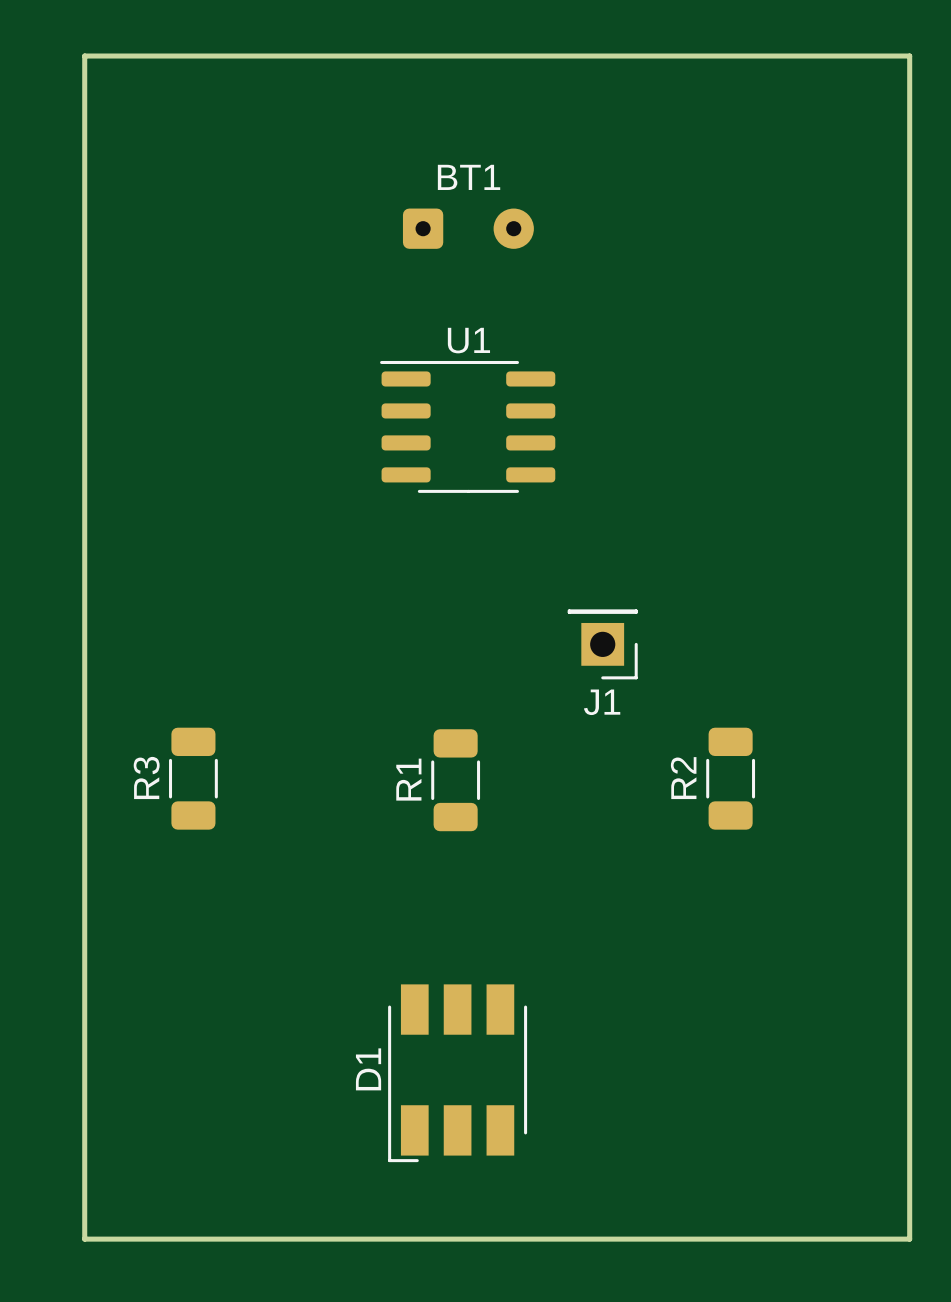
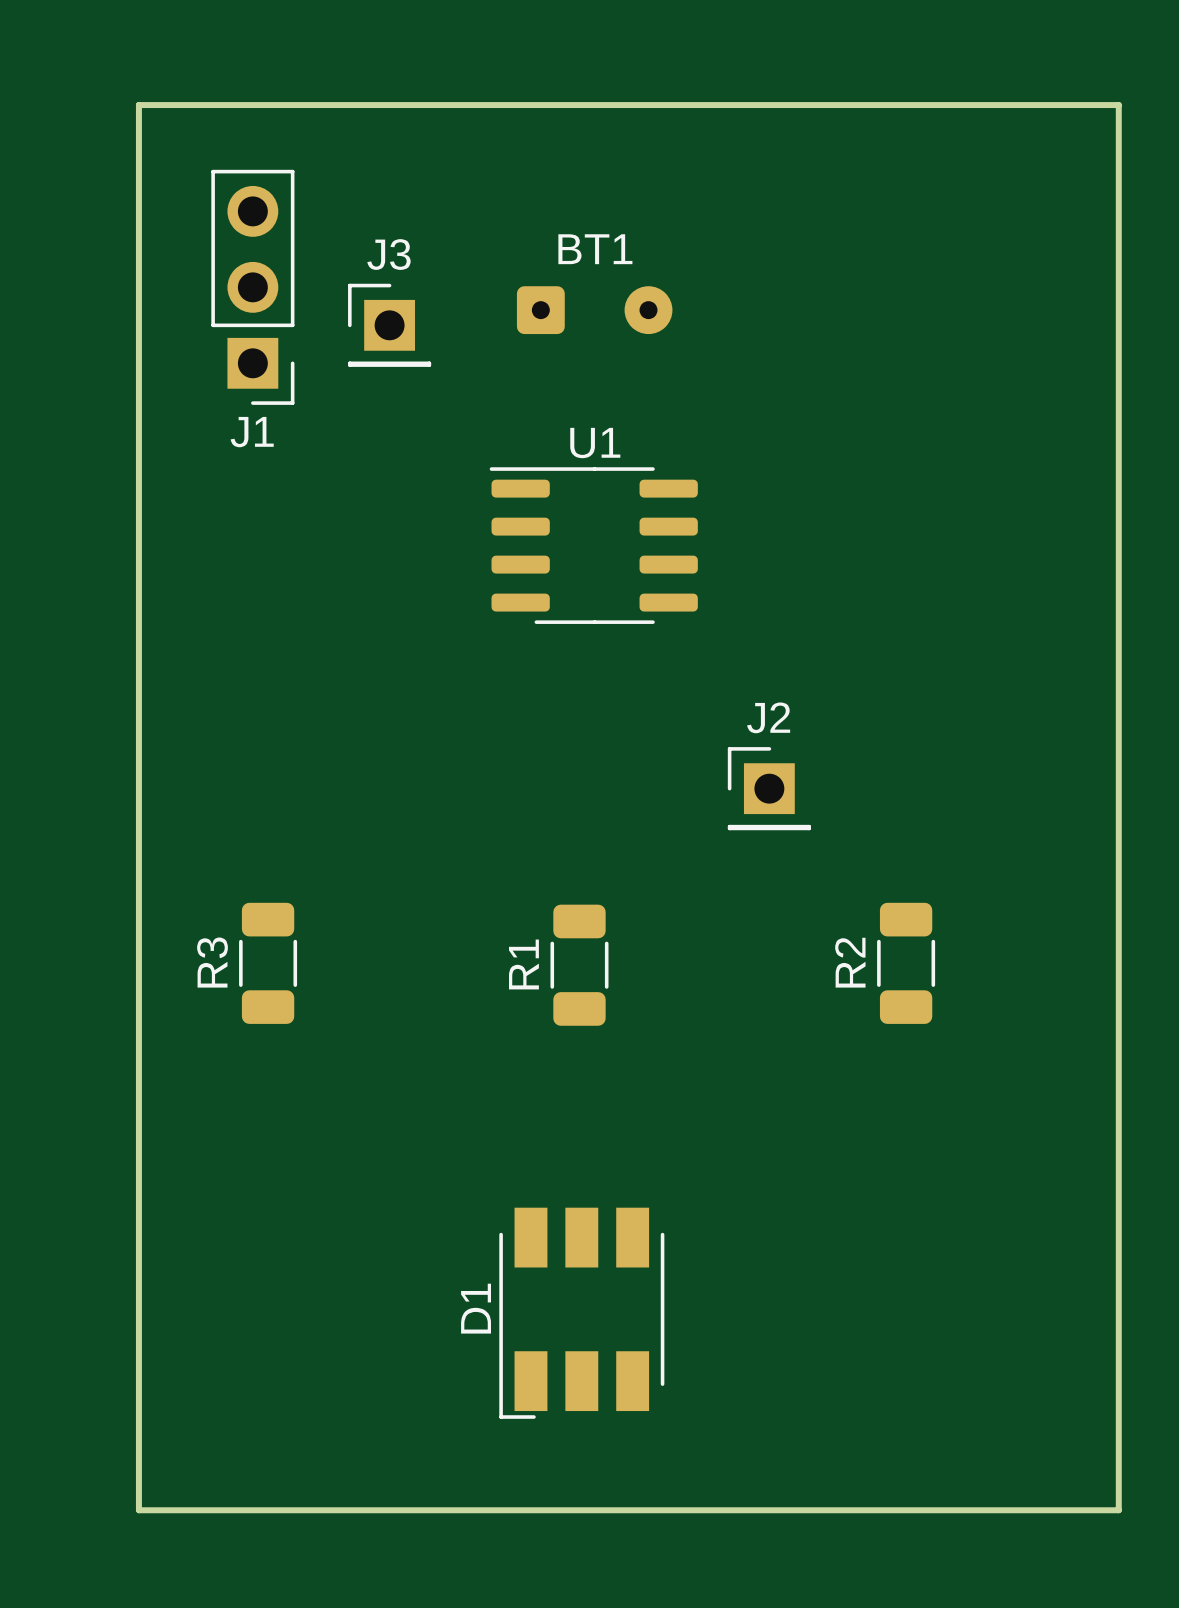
J3: none -> (389, 325)
J1 footprint: [567, 609, 638, 680] -> [211, 169, 295, 405]
J2: none -> (769, 788)
J1 name position: J1 (602, 702) -> J1 (252, 432)

